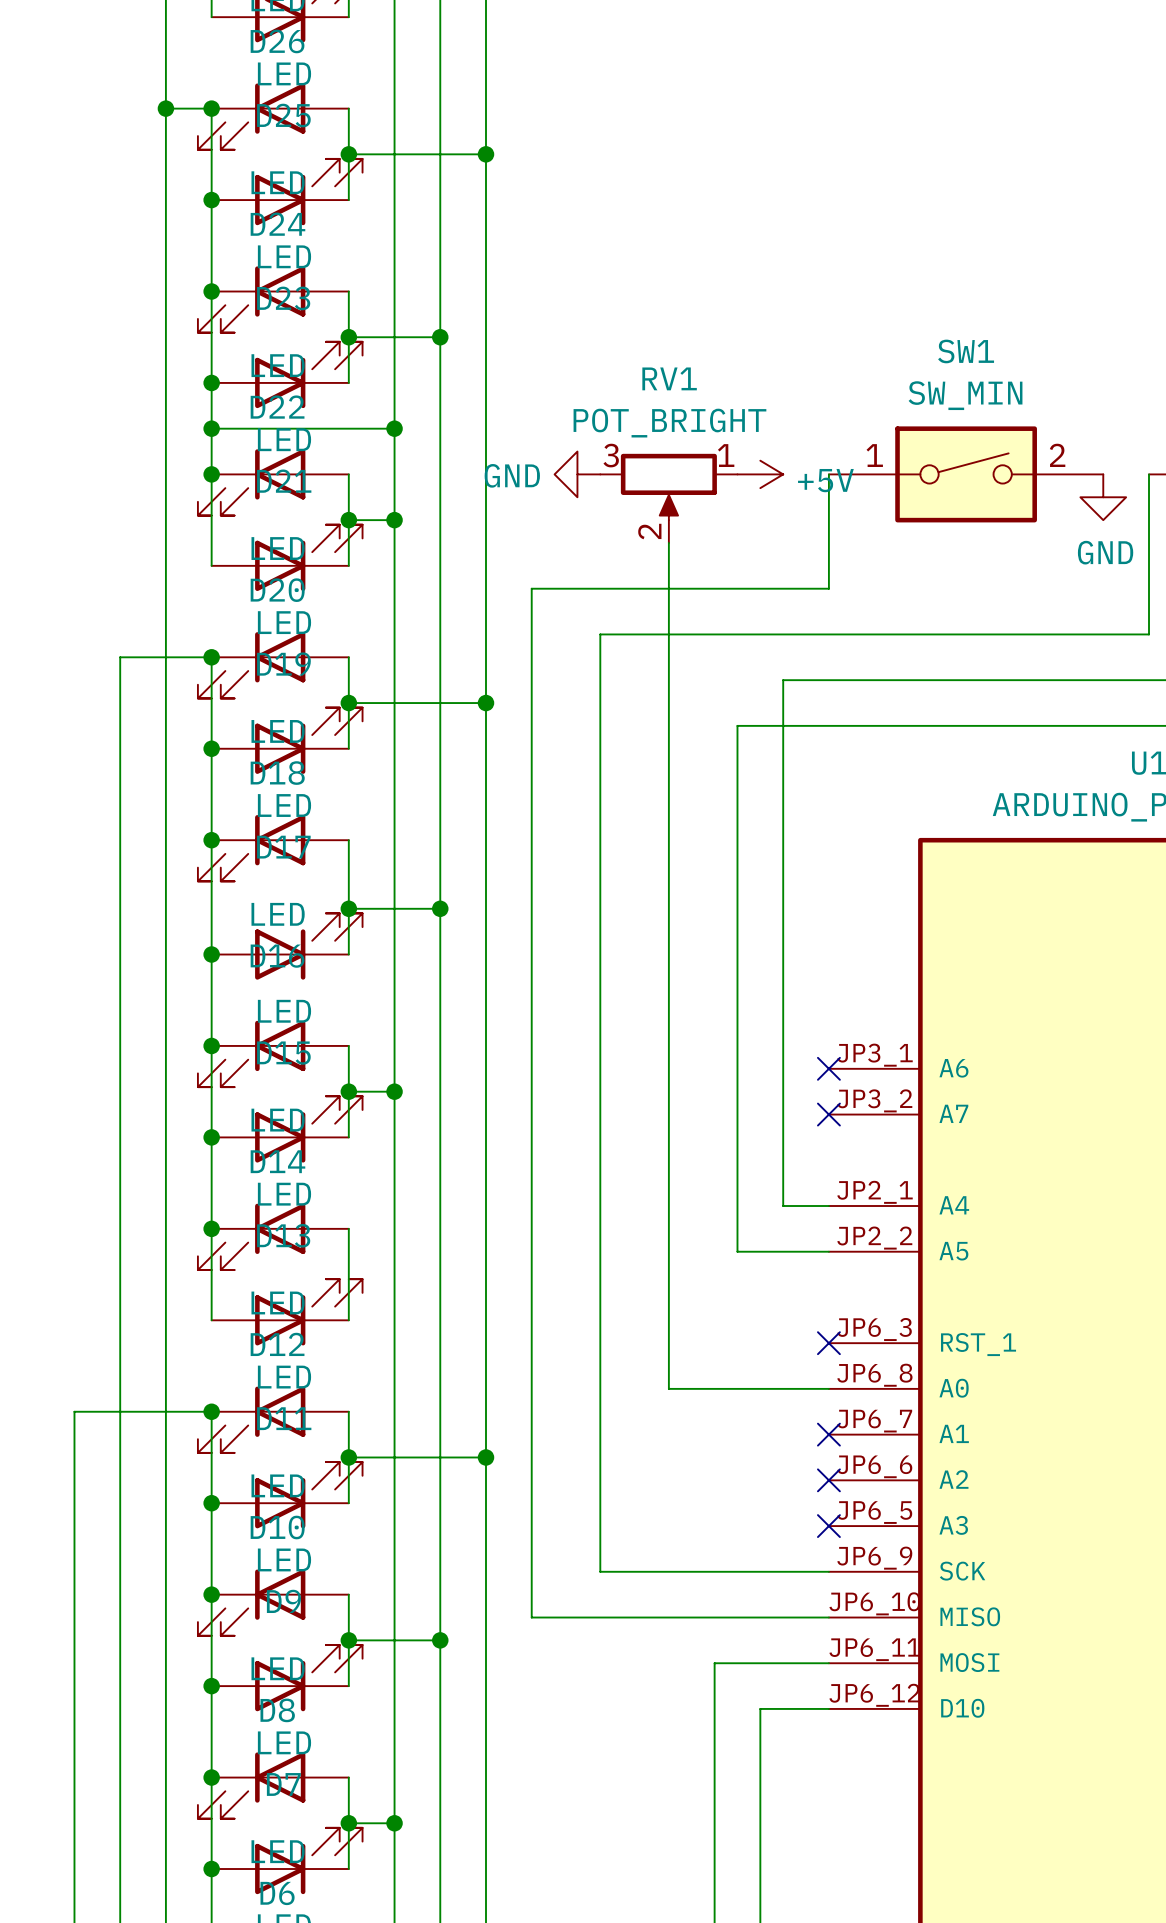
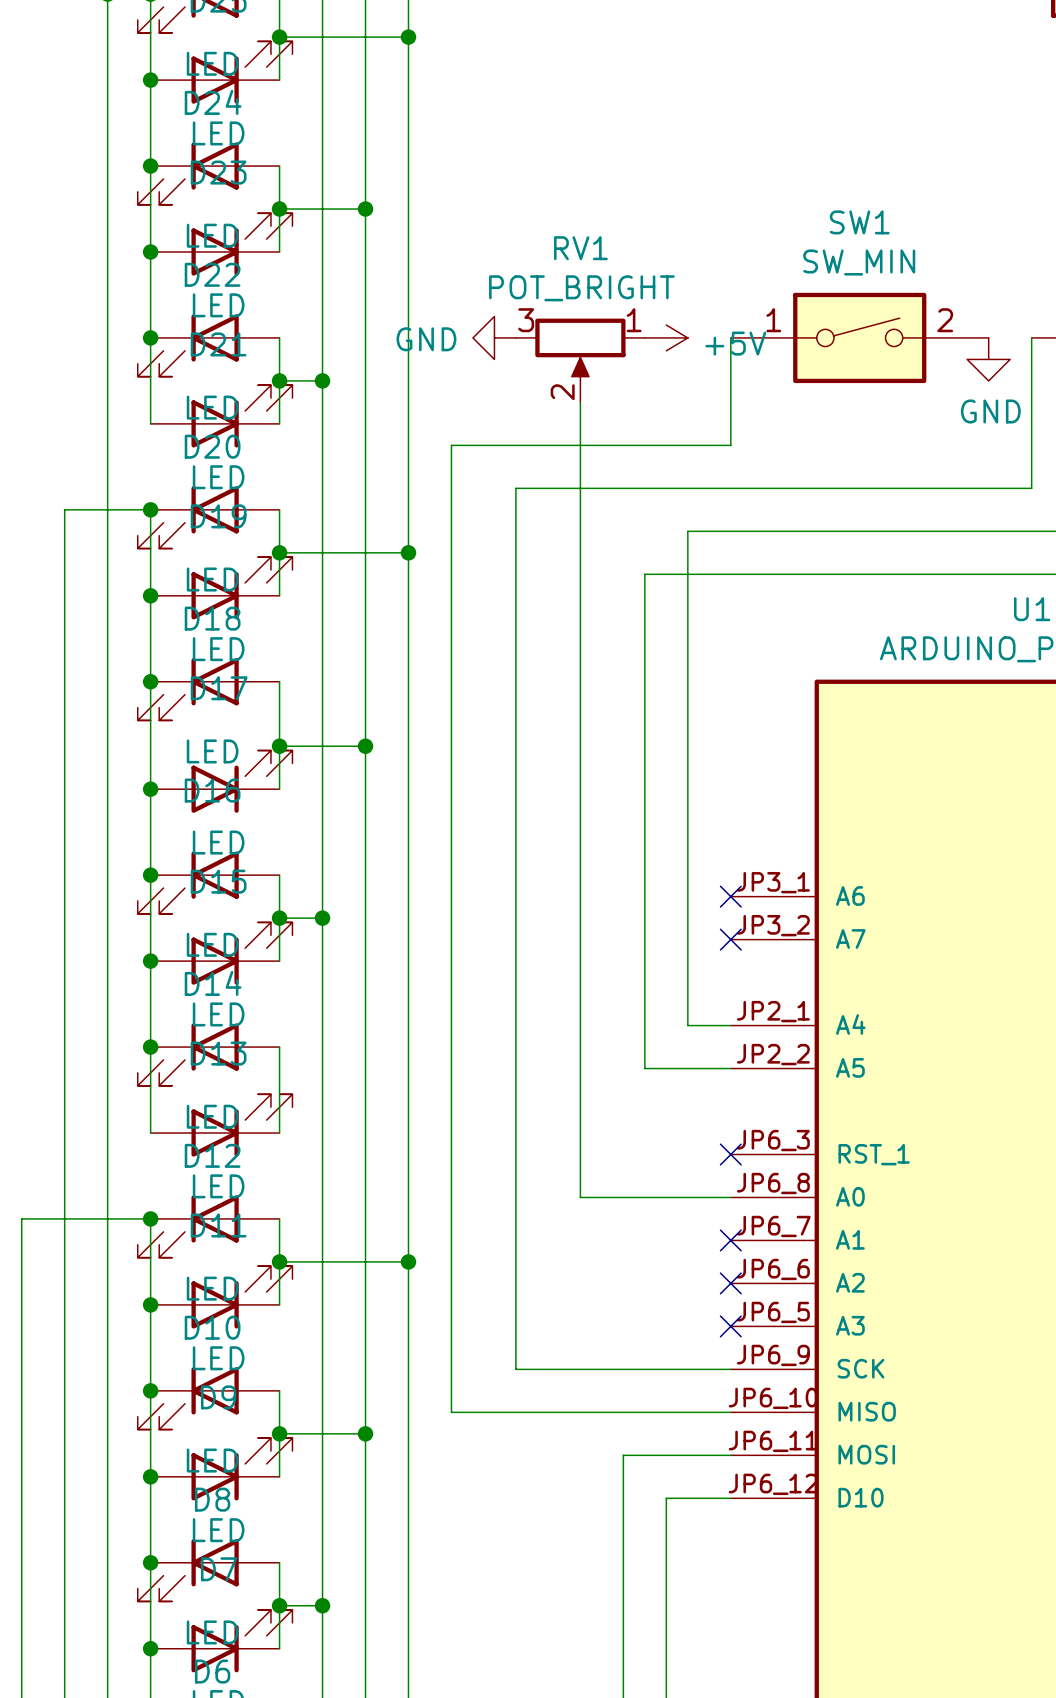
wire: (211, 428) (394, 428) -> none
junction: (211, 428) -> none
junction: (394, 428) -> none

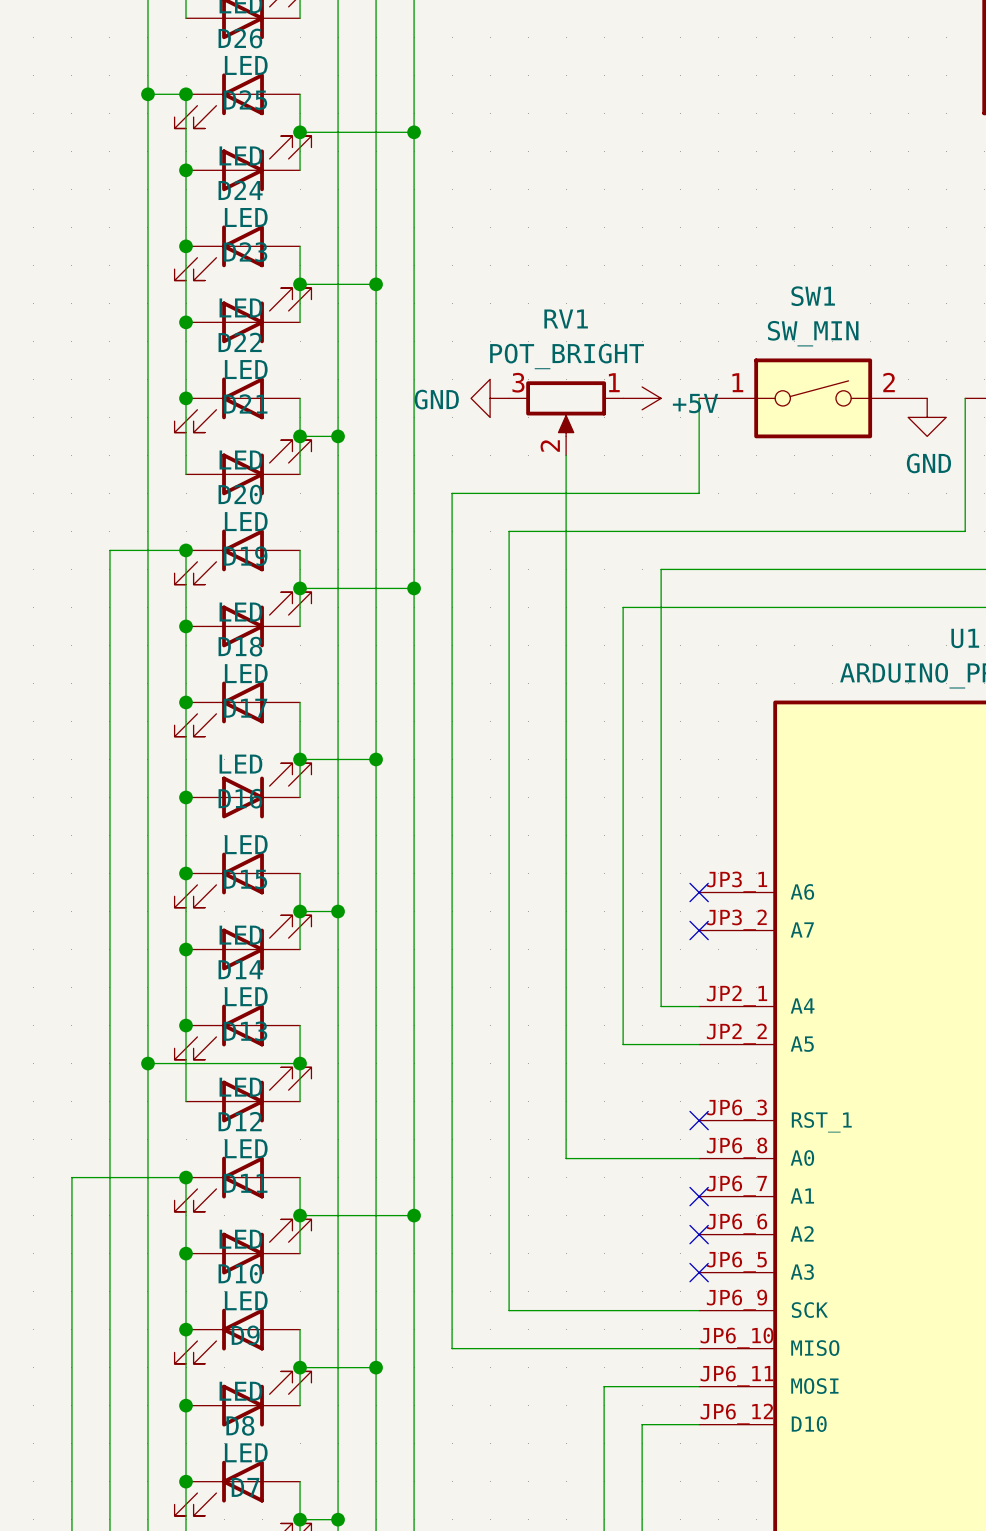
wire: none -> (147, 1063) (300, 1063)
junction: none -> (147, 1063)
junction: none -> (300, 1063)

